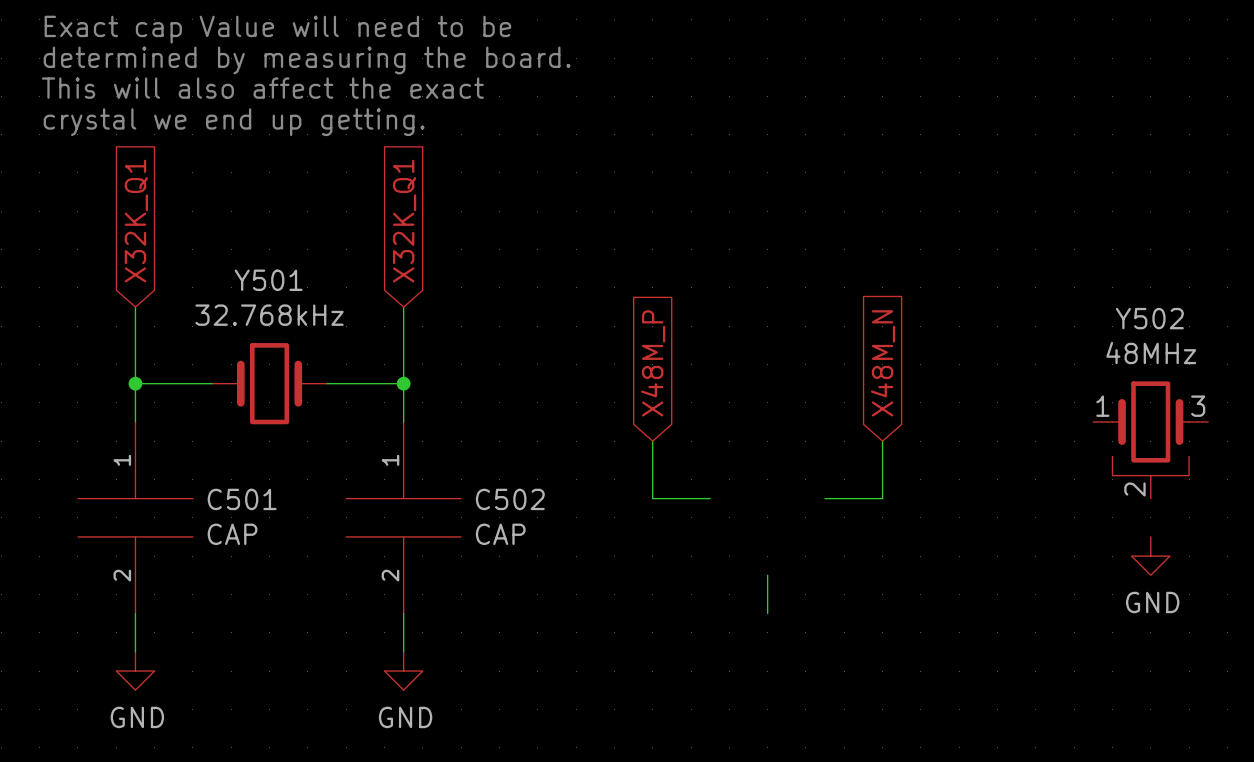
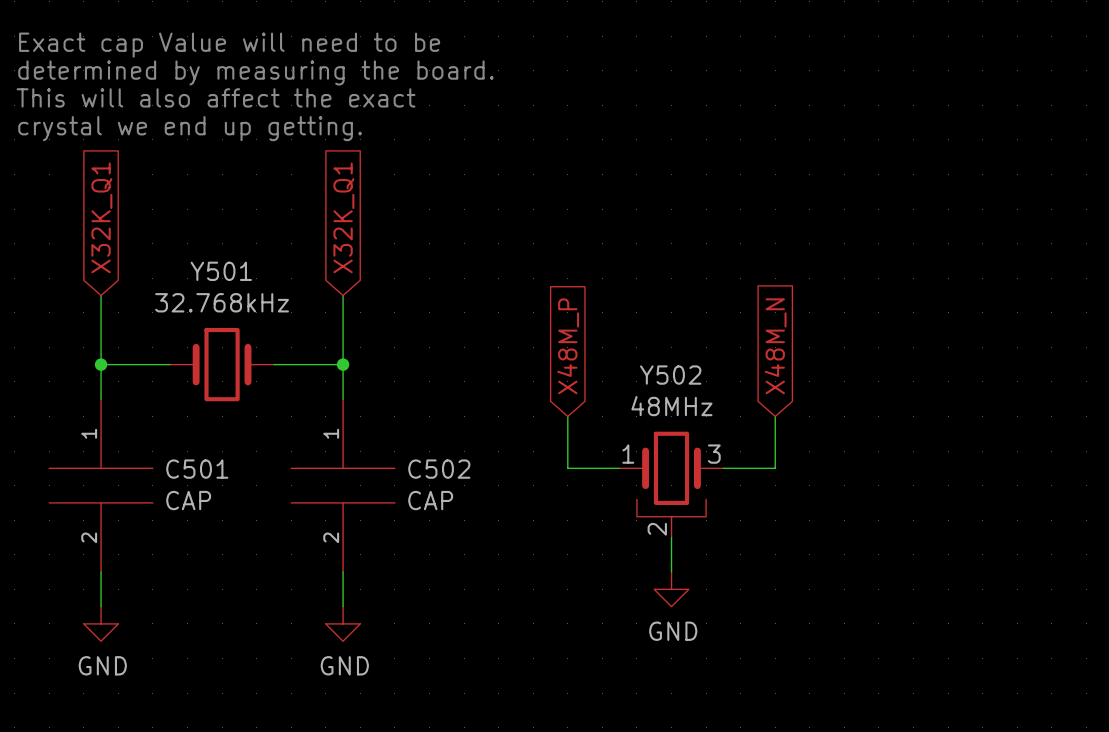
Y502 position: (1150, 439) -> (671, 484)
power symbol: GND (1150, 556) -> none
power symbol: none -> GND (671, 589)

